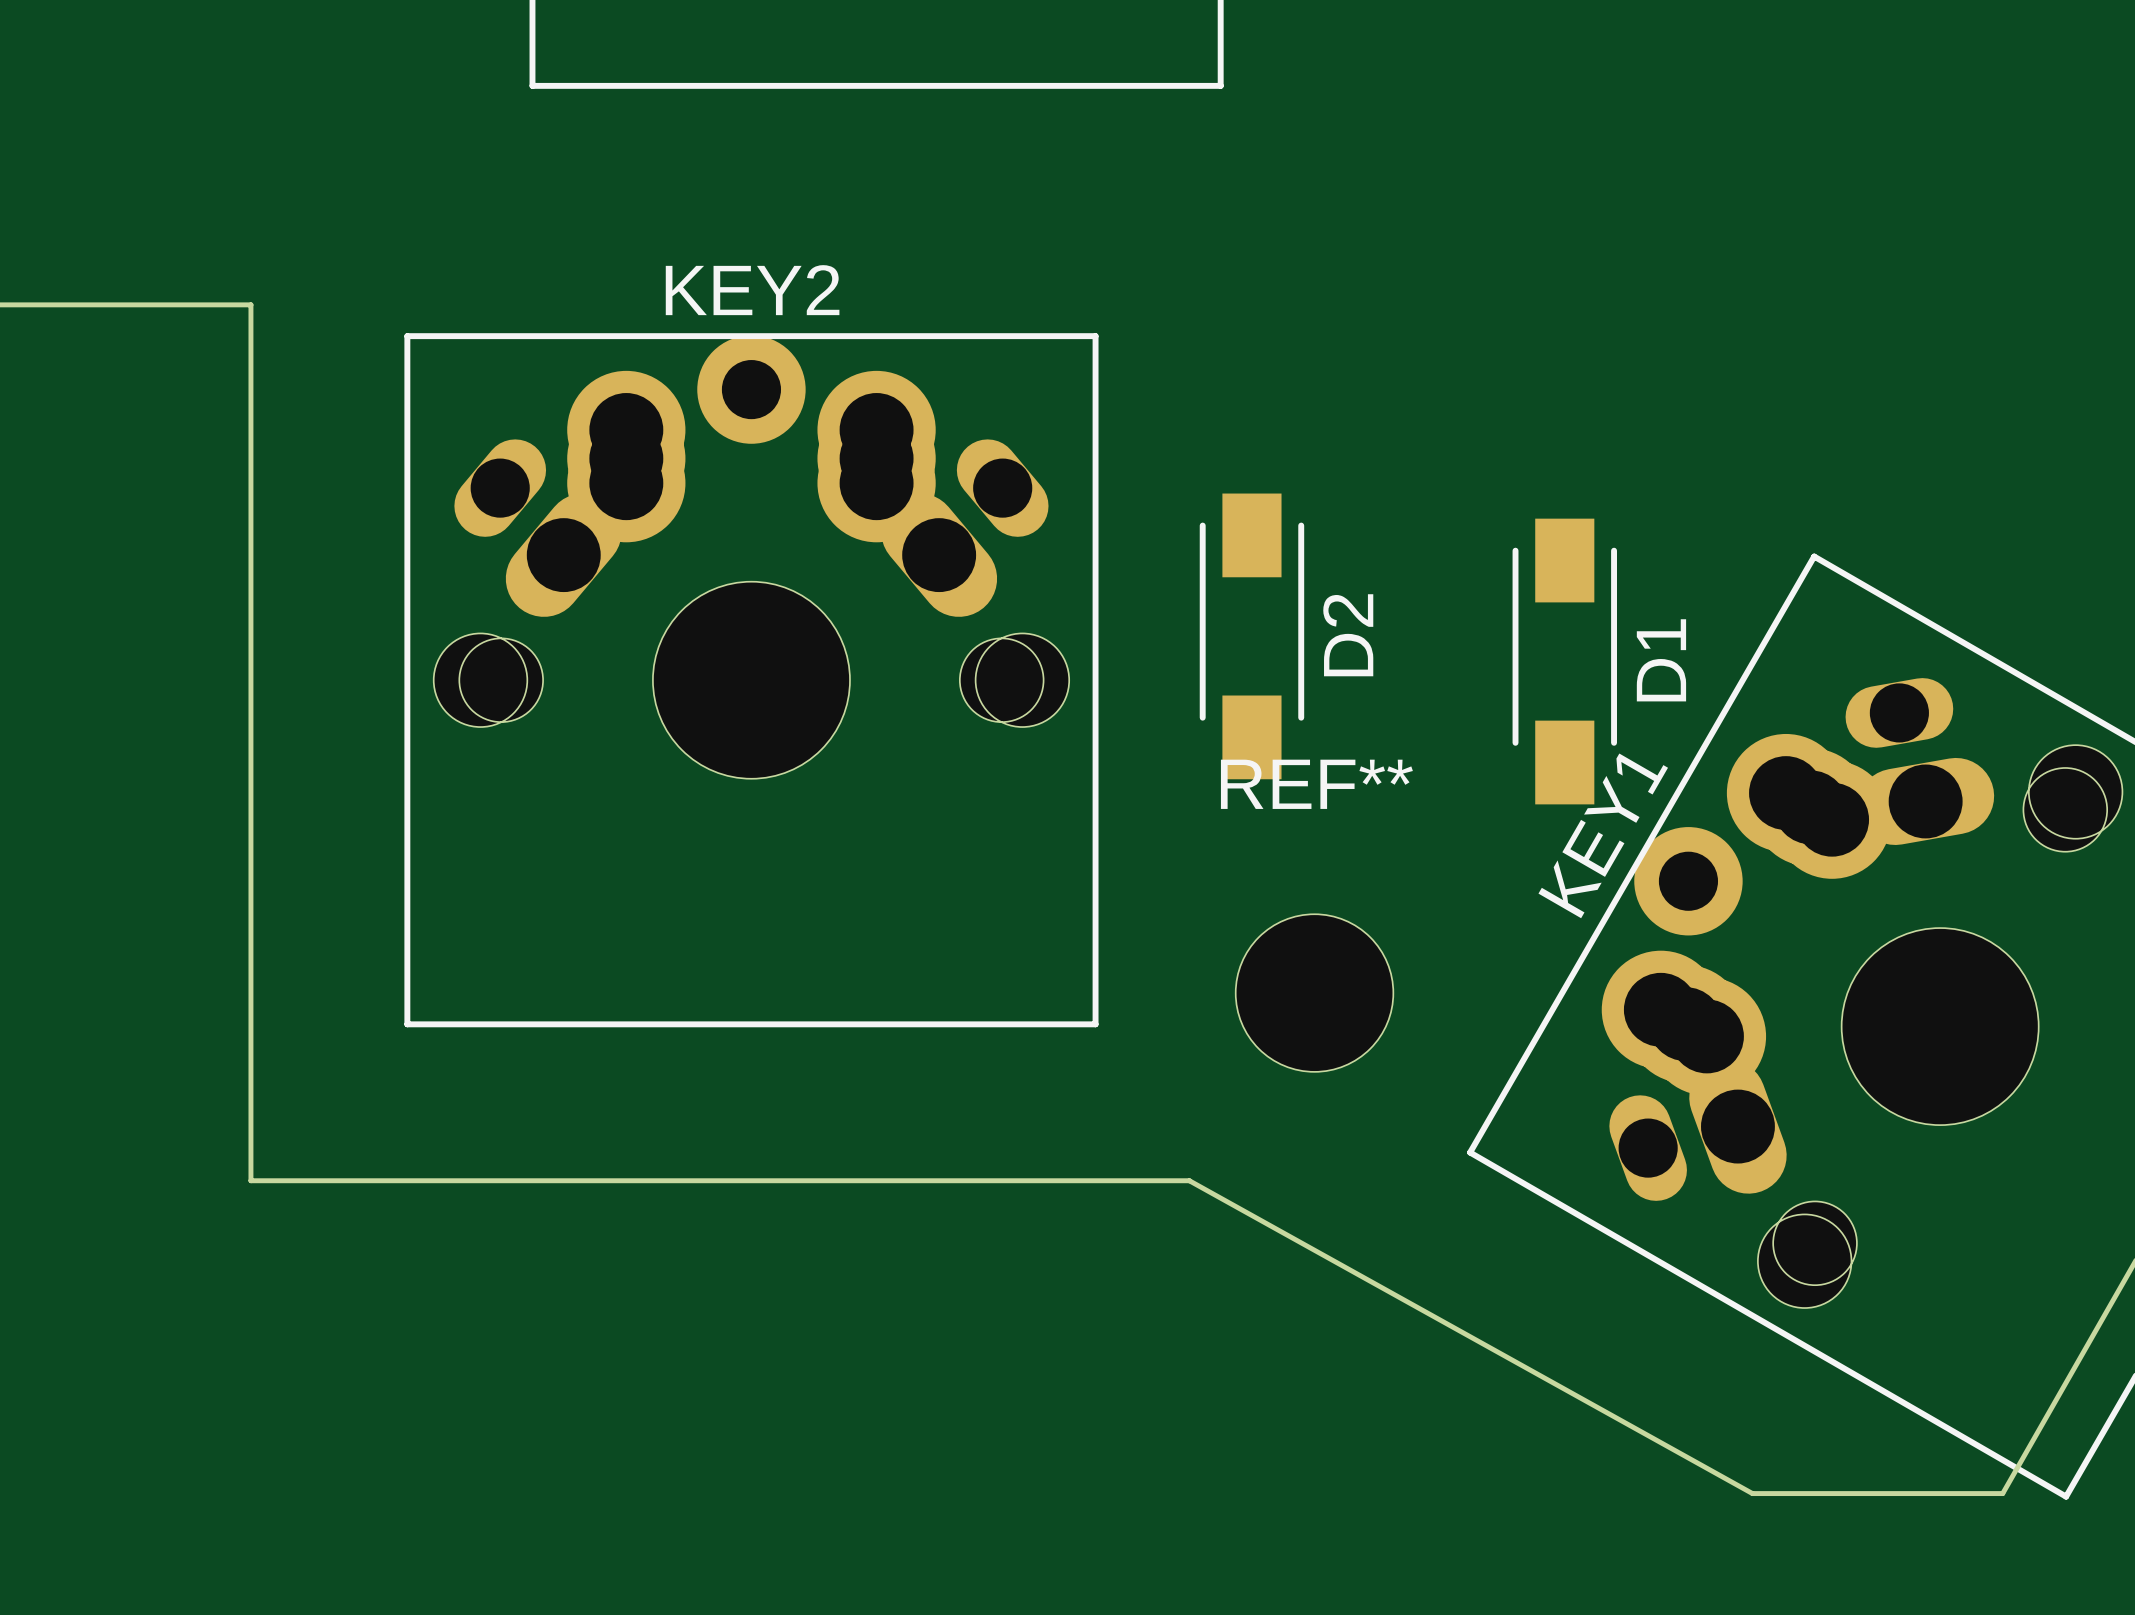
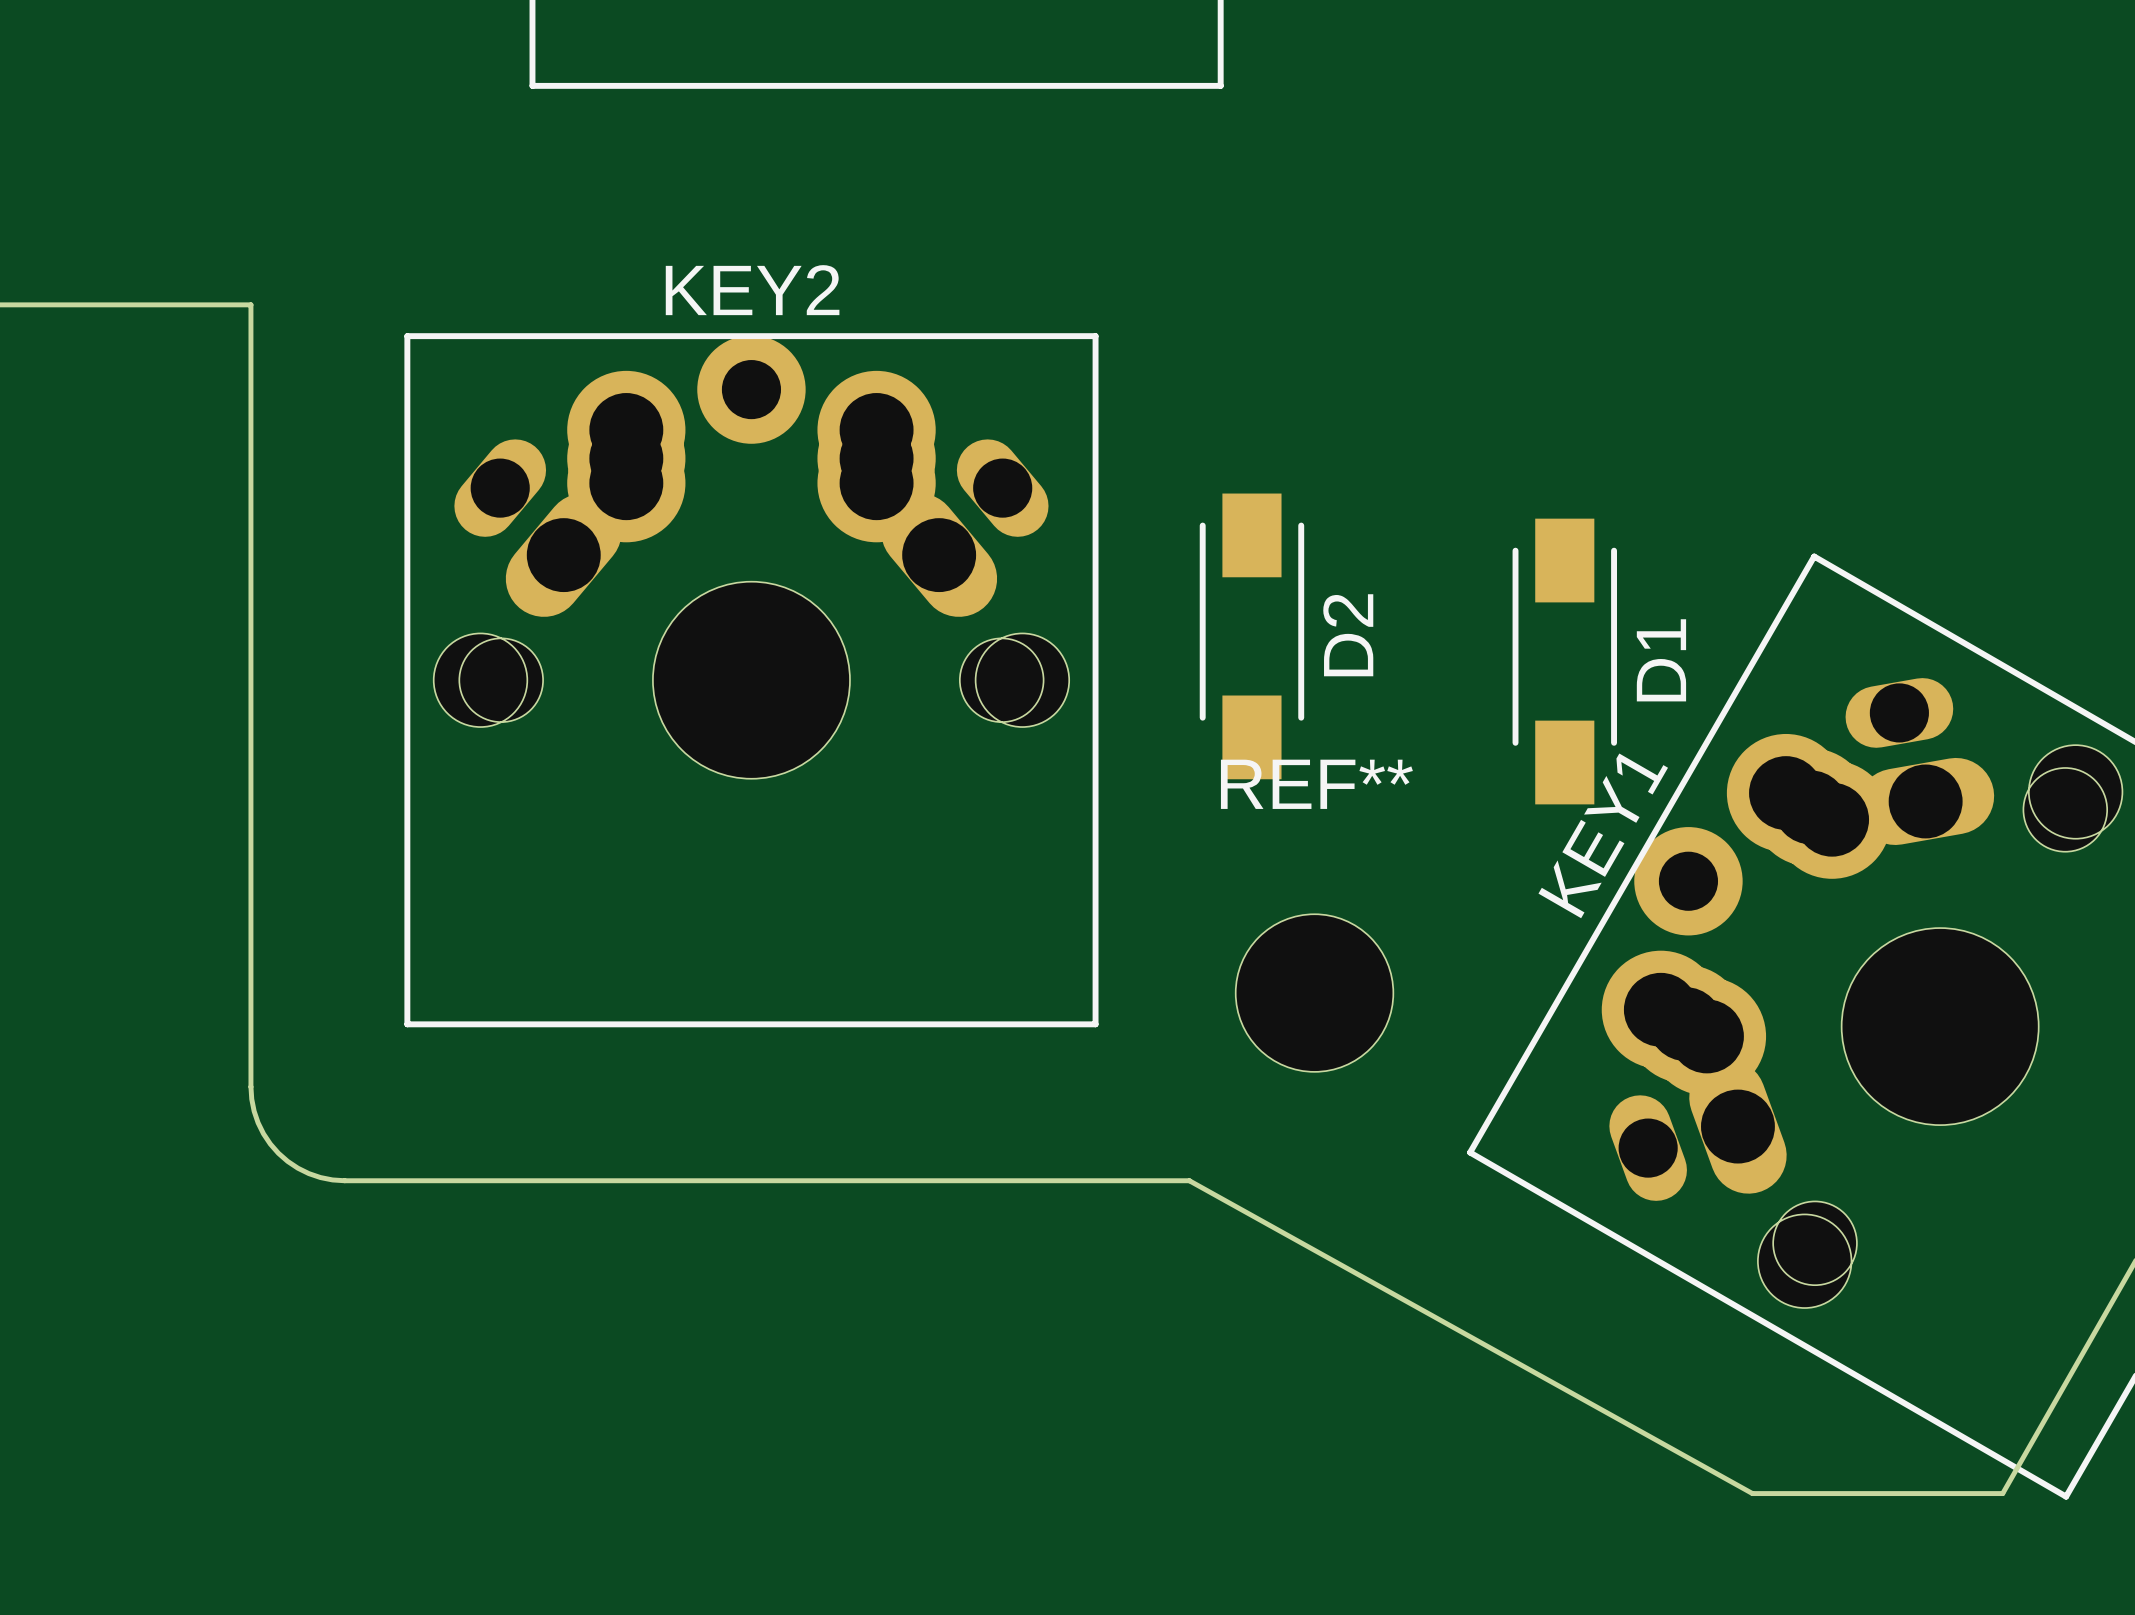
board edge: (250, 1086) (250, 1180) (344, 1180) -> (250, 1086) (251, 1099) (258, 1122) (263, 1133) (278, 1153) (297, 1168) (308, 1173) (332, 1179) (344, 1180)

